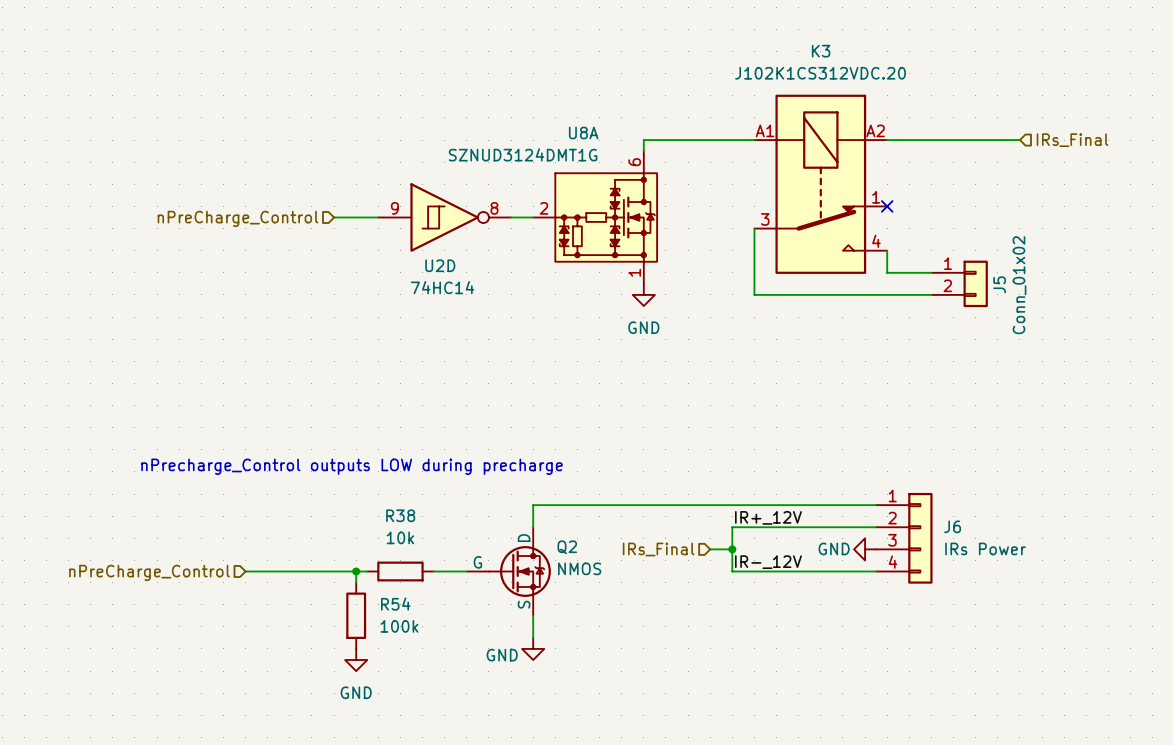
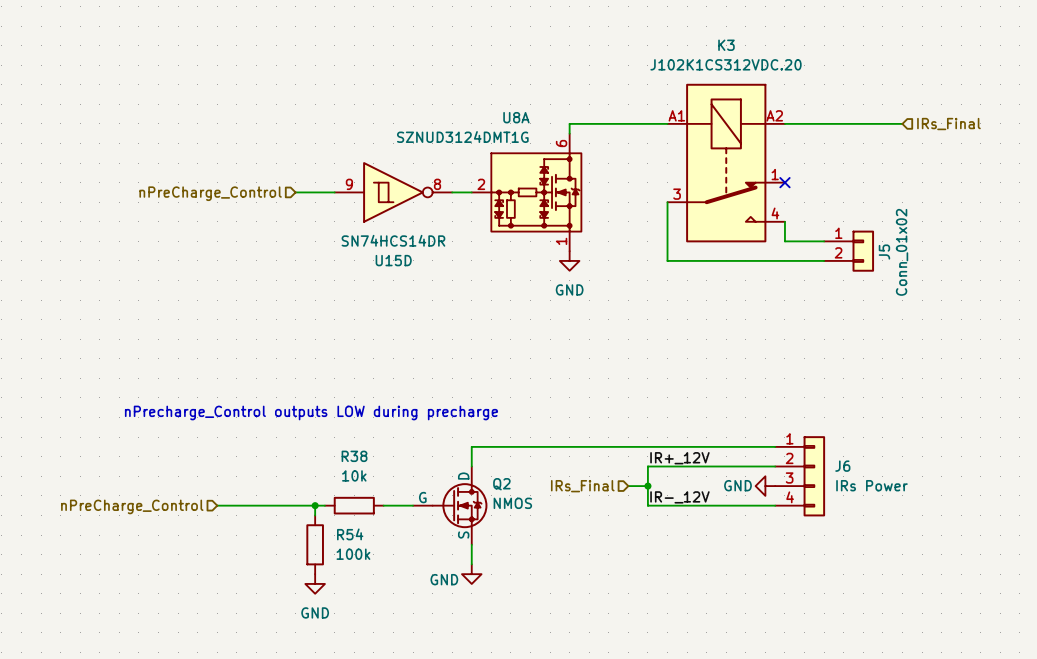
U2D: 74HC14 (444, 217) -> none
U15D: none -> SN74HCS14DR (393, 192)

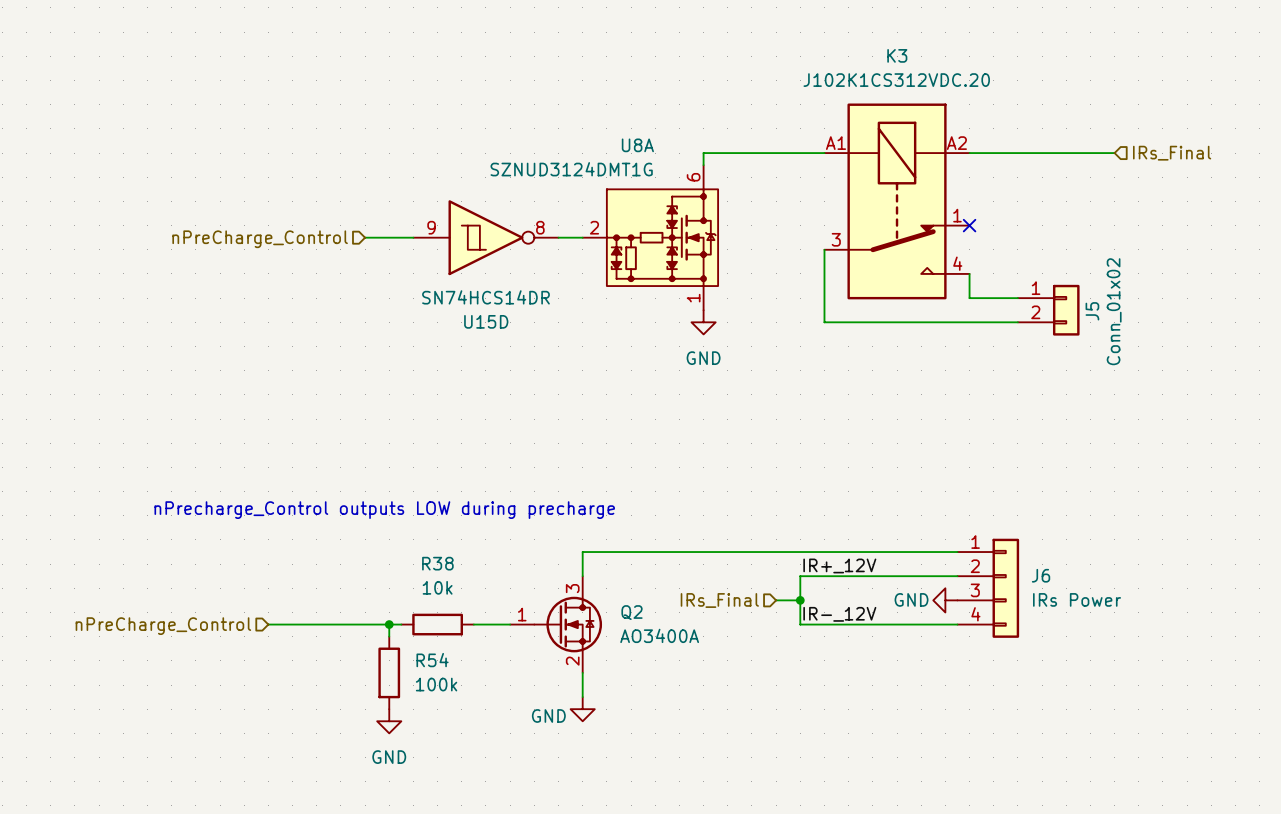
Q2 symbol: [413, 466, 488, 545] -> [510, 576, 603, 673]
Q2 value: NMOS (512, 503) -> AO3400A (659, 635)

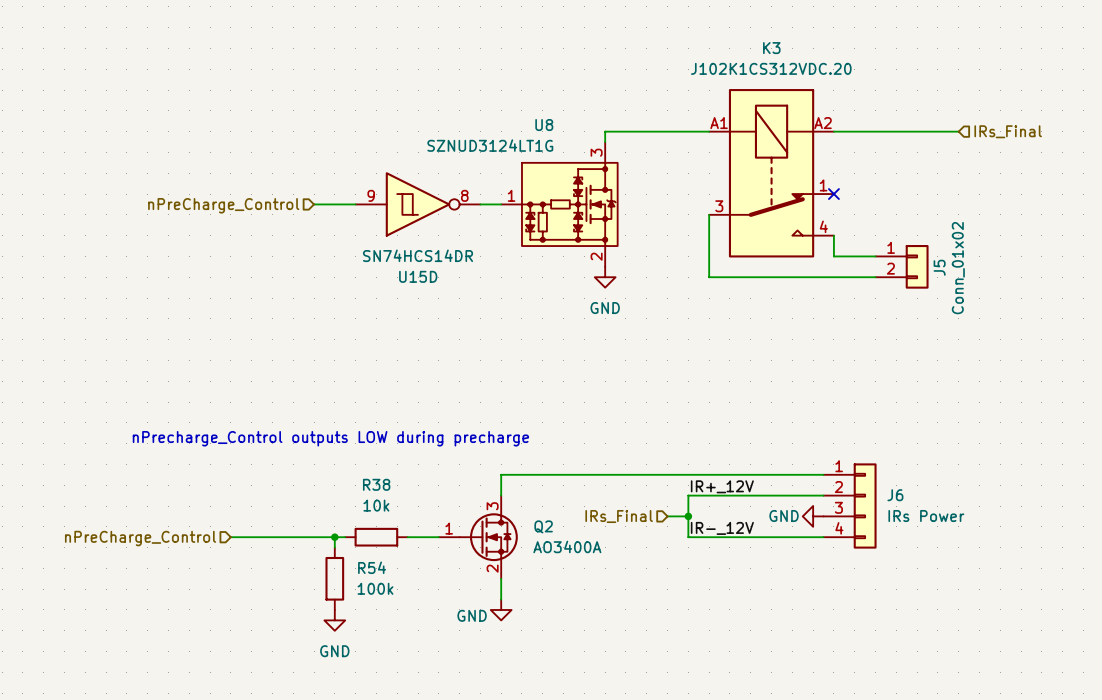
U8A name: U8A (637, 145) -> U8 (544, 125)
U8A value: SZNUD3124DMT1G (571, 169) -> SZNUD3124LT1G (490, 145)
U8A pin number: 6 (693, 177) -> 3 (596, 152)
U8A pin number: 2 (594, 227) -> 1 (511, 195)
U8A pin number: 1 (693, 298) -> 2 (596, 256)

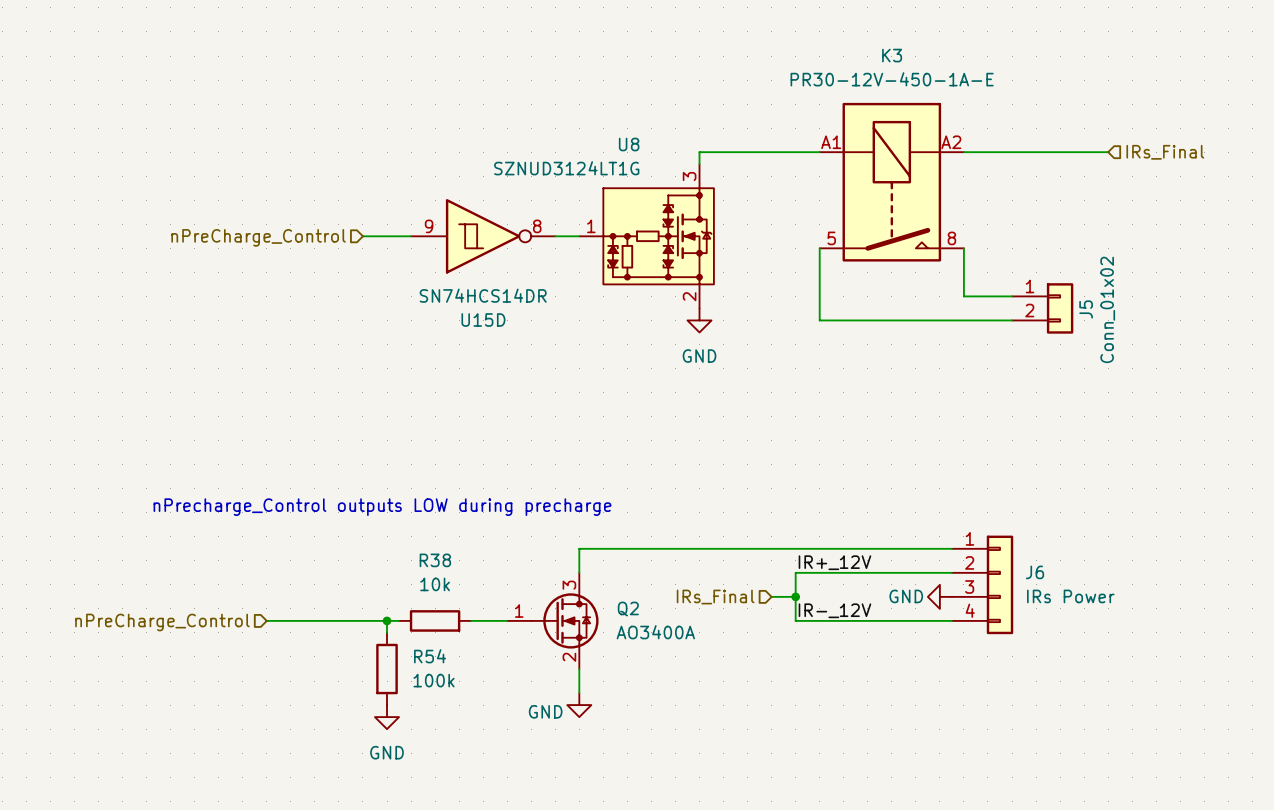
K3 value: J102K1CS312VDC.20 (771, 68) -> PR30-12V-450-1A-E (892, 79)
K3 symbol: [709, 89, 834, 258] -> [819, 102, 964, 262]
no-connect mark: (833, 194) -> none
wire: none -> (963, 248) (963, 272)

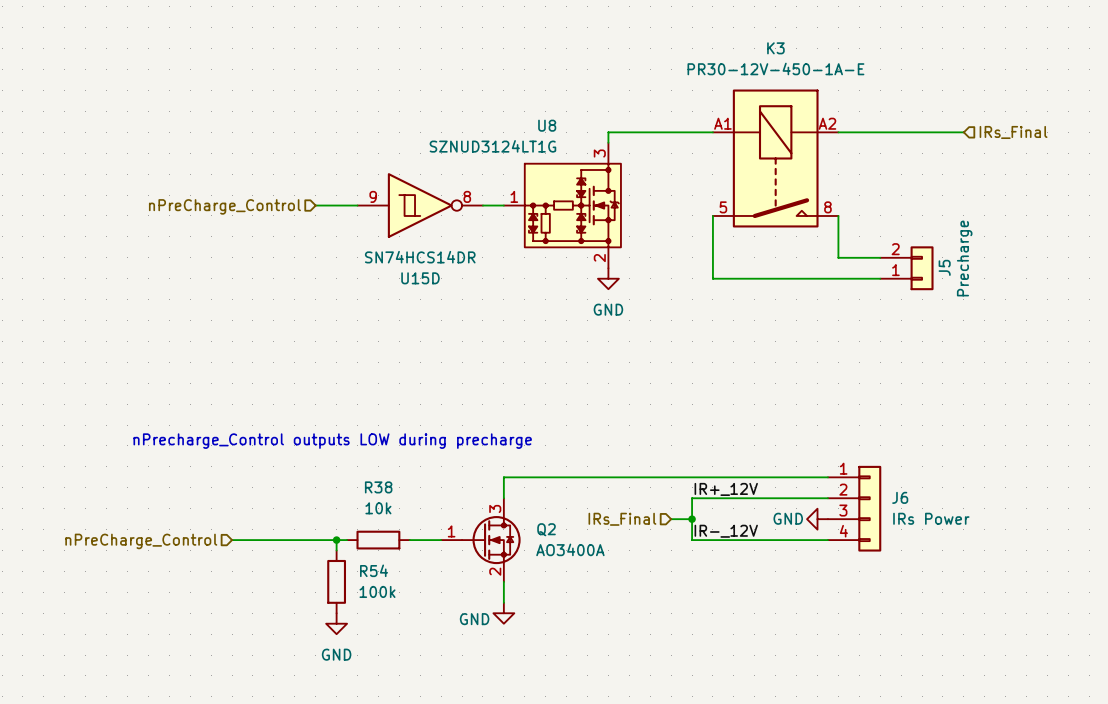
J5 flip: as is (1060, 308) -> up-down (922, 268)
J5 value: Conn_01x02 (1107, 309) -> Precharge (964, 258)

